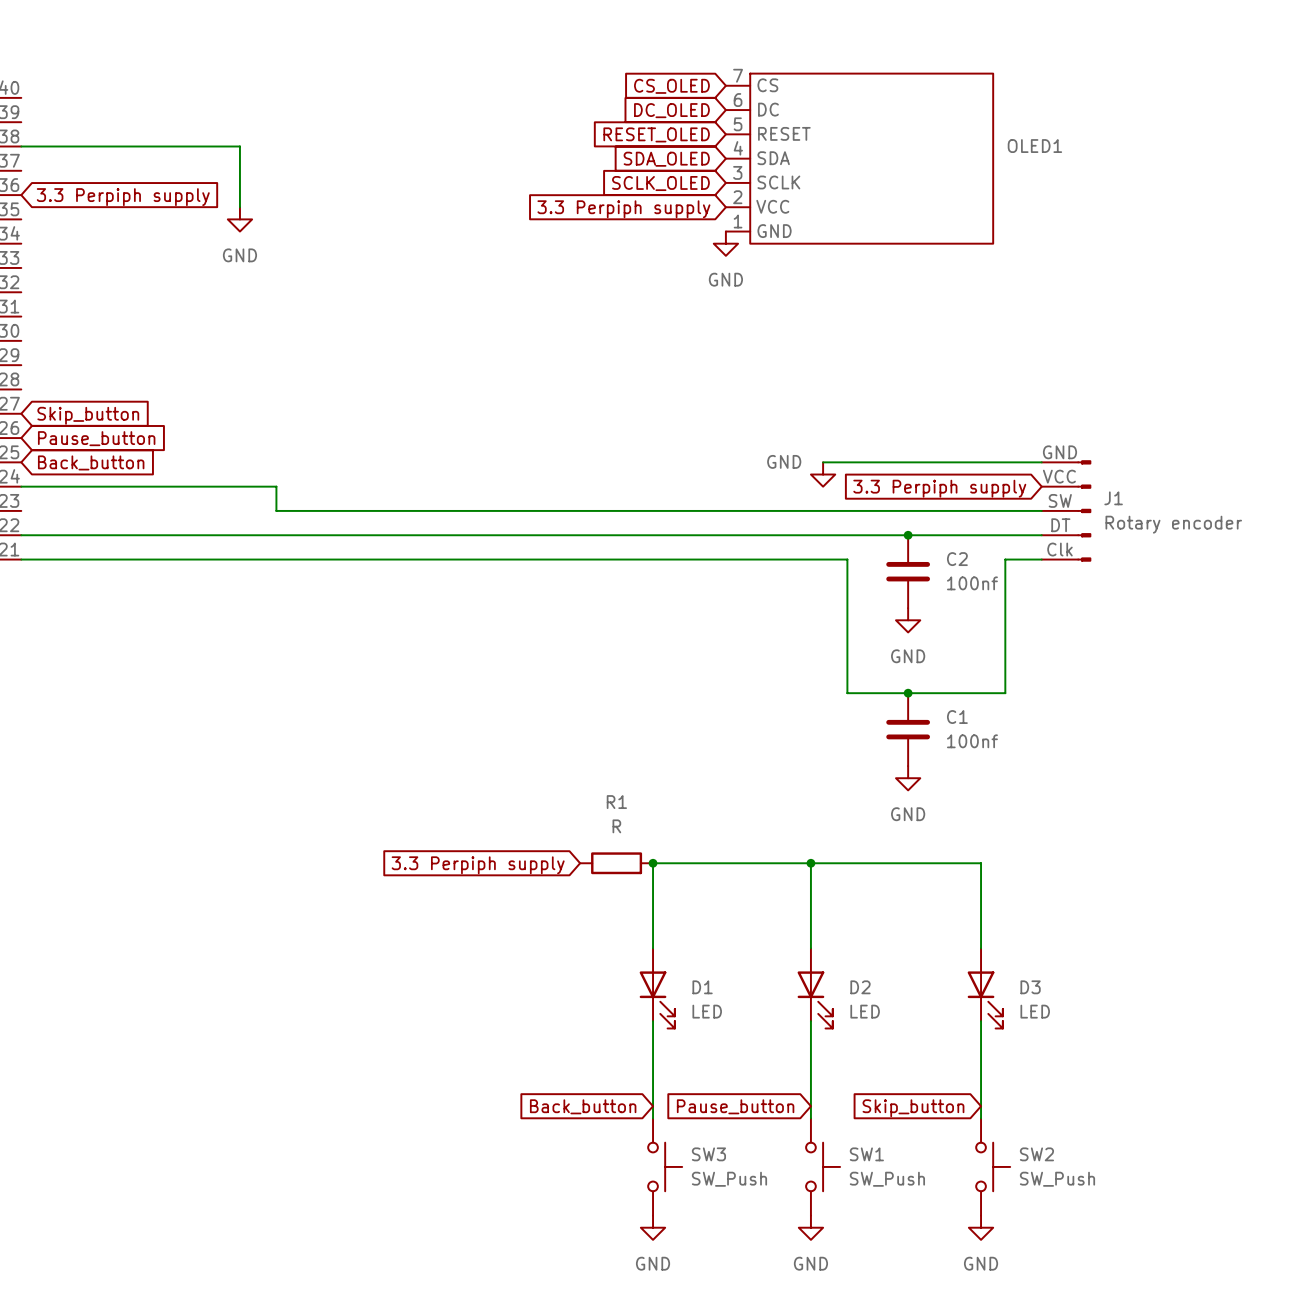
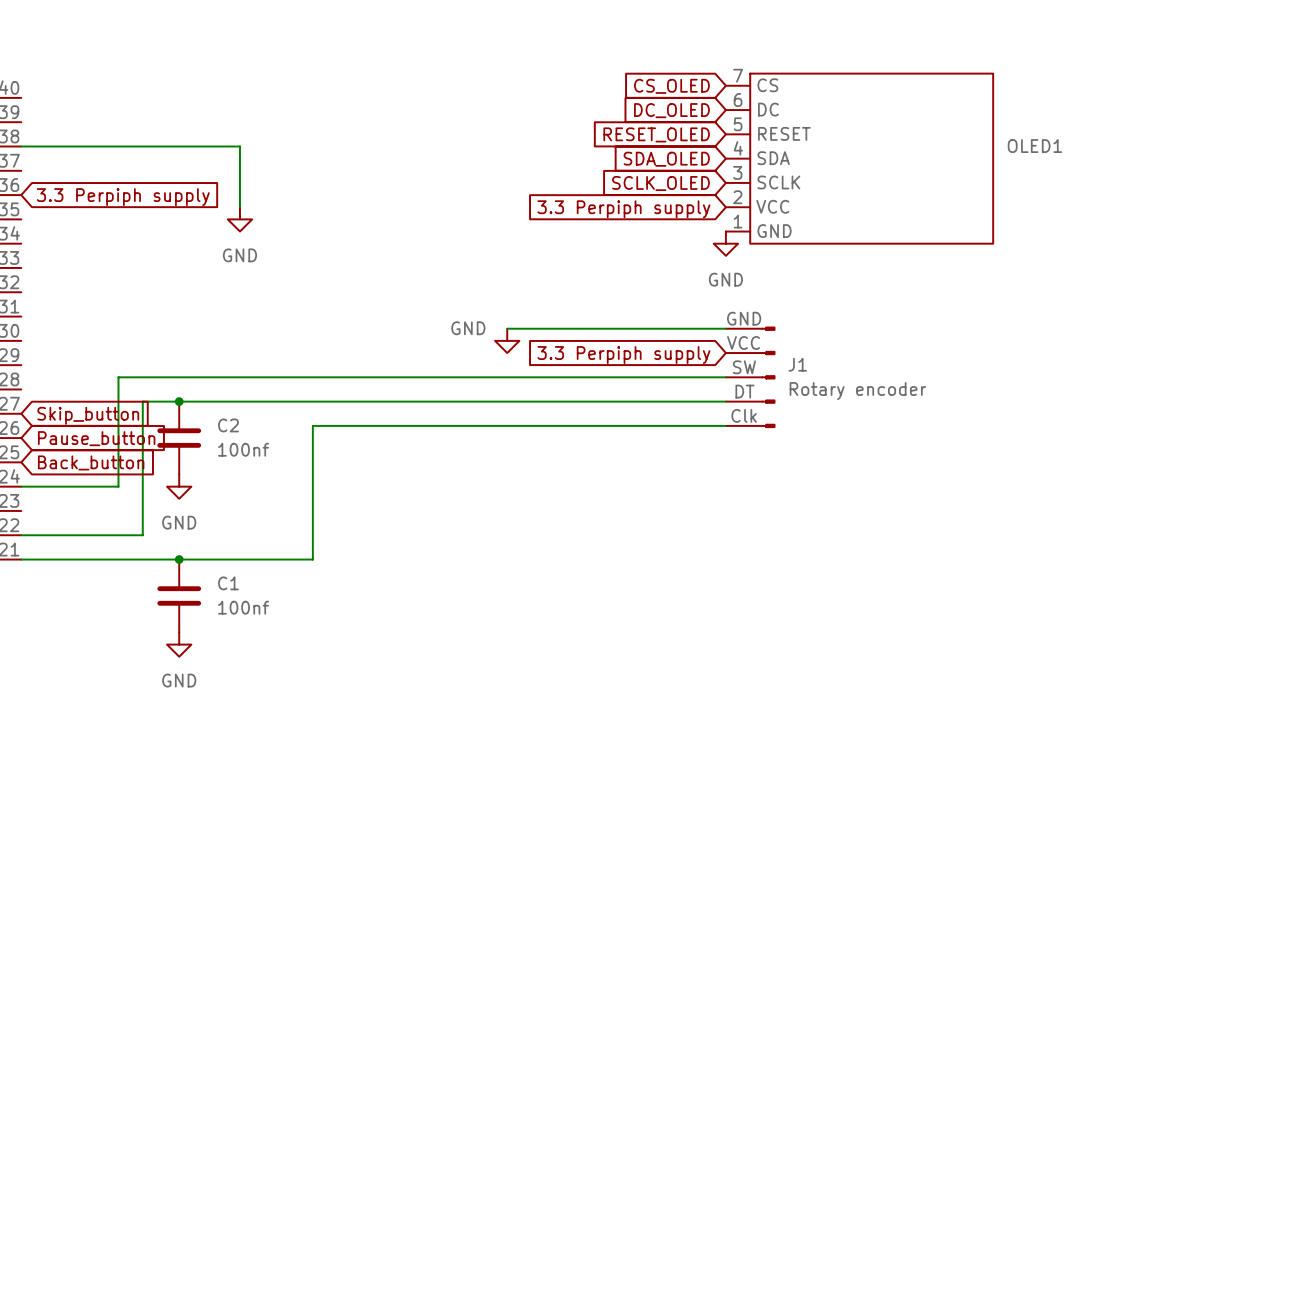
wire: none -> (507, 328) (725, 328)
power symbol: none -> GND (507, 340)
global label: none -> 3.3 Perpiph supply (623, 355)
junction: none -> (179, 401)
wire: (823, 462) (1041, 462) -> none
power symbol: GND (823, 474) -> none
wire: (118, 486) (276, 486) (276, 510) (1041, 510) -> (118, 486) (118, 377) (725, 377)
power symbol: none -> GND (179, 486)
global label: 3.3 Perpiph supply (939, 488) -> none
J1 position: (1066, 510) -> (750, 377)
wire: (142, 535) (1041, 535) -> (142, 535) (142, 401) (725, 401)
junction: (908, 535) -> none
junction: none -> (179, 559)
wire: (312, 559) (847, 559) (847, 693) (1005, 693) (1005, 559) (1041, 559) -> (312, 559) (312, 425) (725, 425)
C2 position: (908, 571) -> (179, 438)
power symbol: GND (908, 620) -> none
power symbol: none -> GND (179, 644)
junction: (908, 693) -> none
C1 position: (908, 729) -> (179, 595)
power symbol: GND (908, 778) -> none
R1: R (616, 863) -> none
junction: (653, 863) -> none
wire: (810, 863) (810, 948) -> none
junction: (810, 863) -> none
global label: 3.3 Perpiph supply (478, 865) -> none
wire: (653, 948) (653, 863) (981, 863) (981, 948) -> none
D1: LED (657, 988) -> none
D2: LED (815, 988) -> none
D3: LED (985, 988) -> none
wire: (653, 1021) (653, 1118) -> none
wire: (810, 1021) (810, 1118) -> none
wire: (981, 1021) (981, 1118) -> none
global label: Back_button (583, 1106) -> none
global label: Pause_button (735, 1106) -> none
global label: Skip_button (913, 1108) -> none
SW3: SW_Push (665, 1166) -> none
SW1: SW_Push (823, 1166) -> none
SW2: SW_Push (993, 1166) -> none
power symbol: GND (653, 1227) -> none
power symbol: GND (810, 1227) -> none
power symbol: GND (981, 1227) -> none

